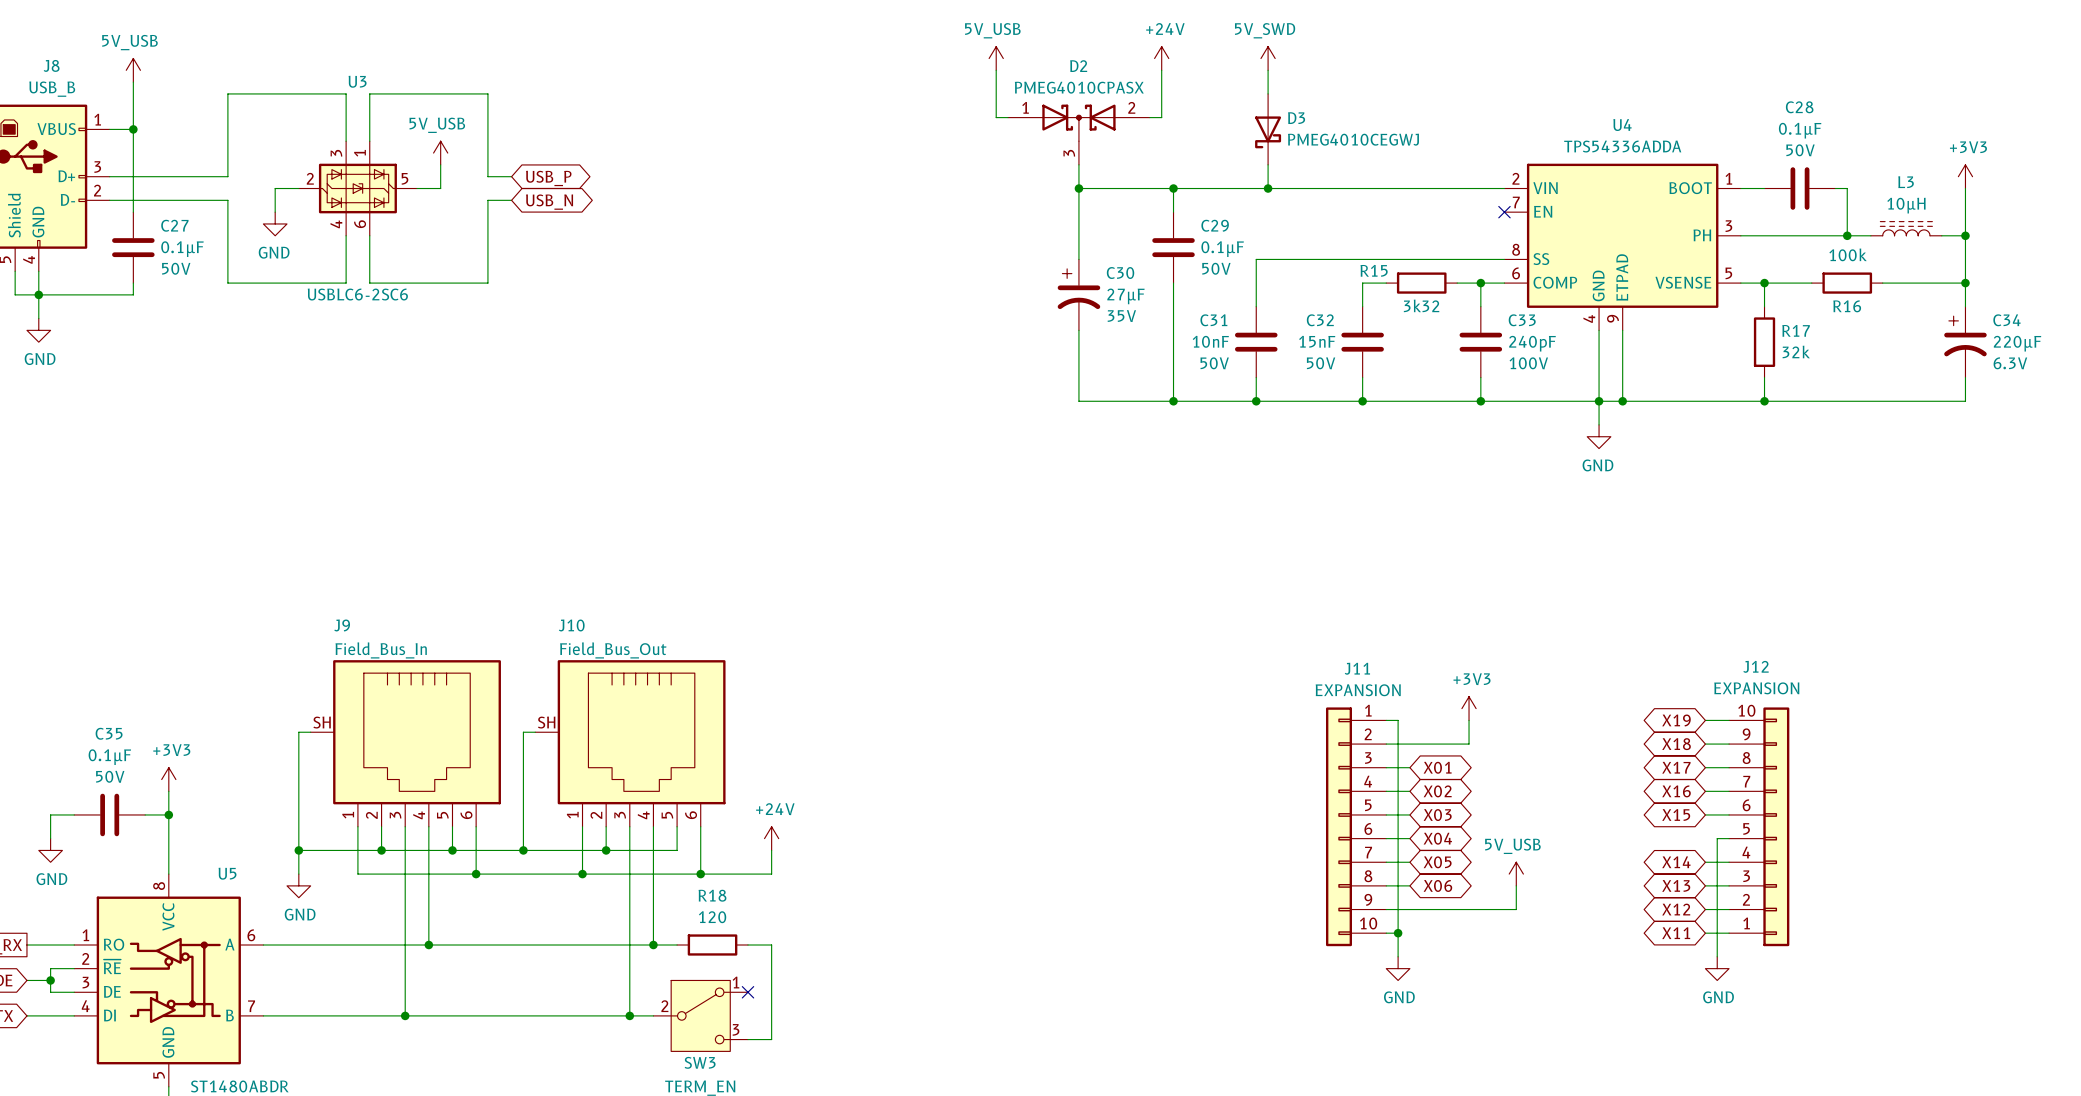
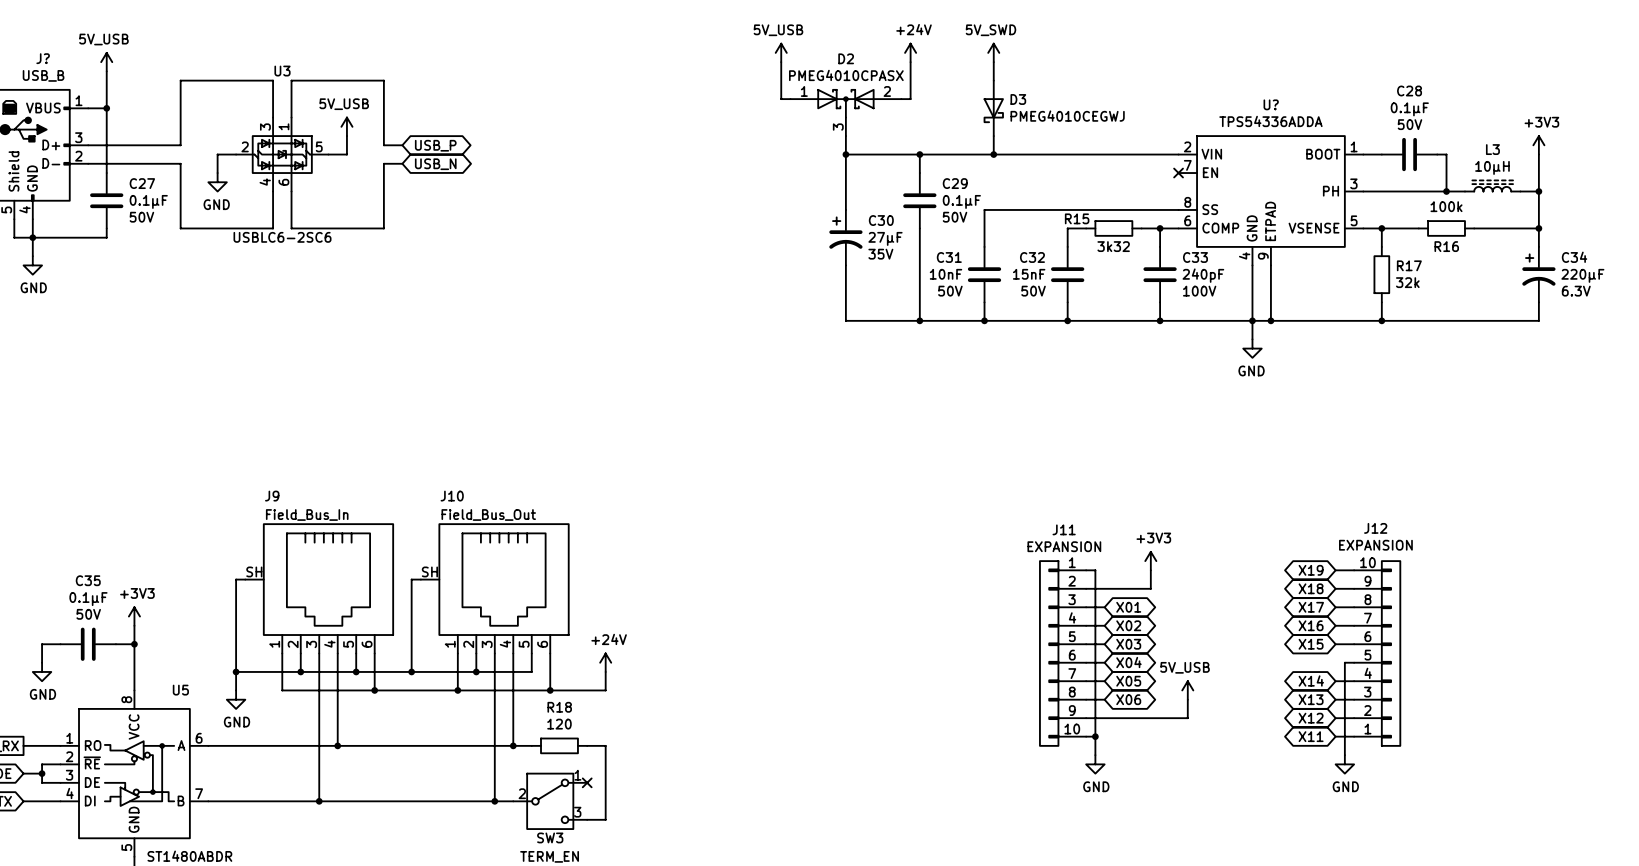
J8 name: J8 (51, 65) -> J? (43, 58)
U4 name: U4 (1622, 125) -> U? (1271, 104)

